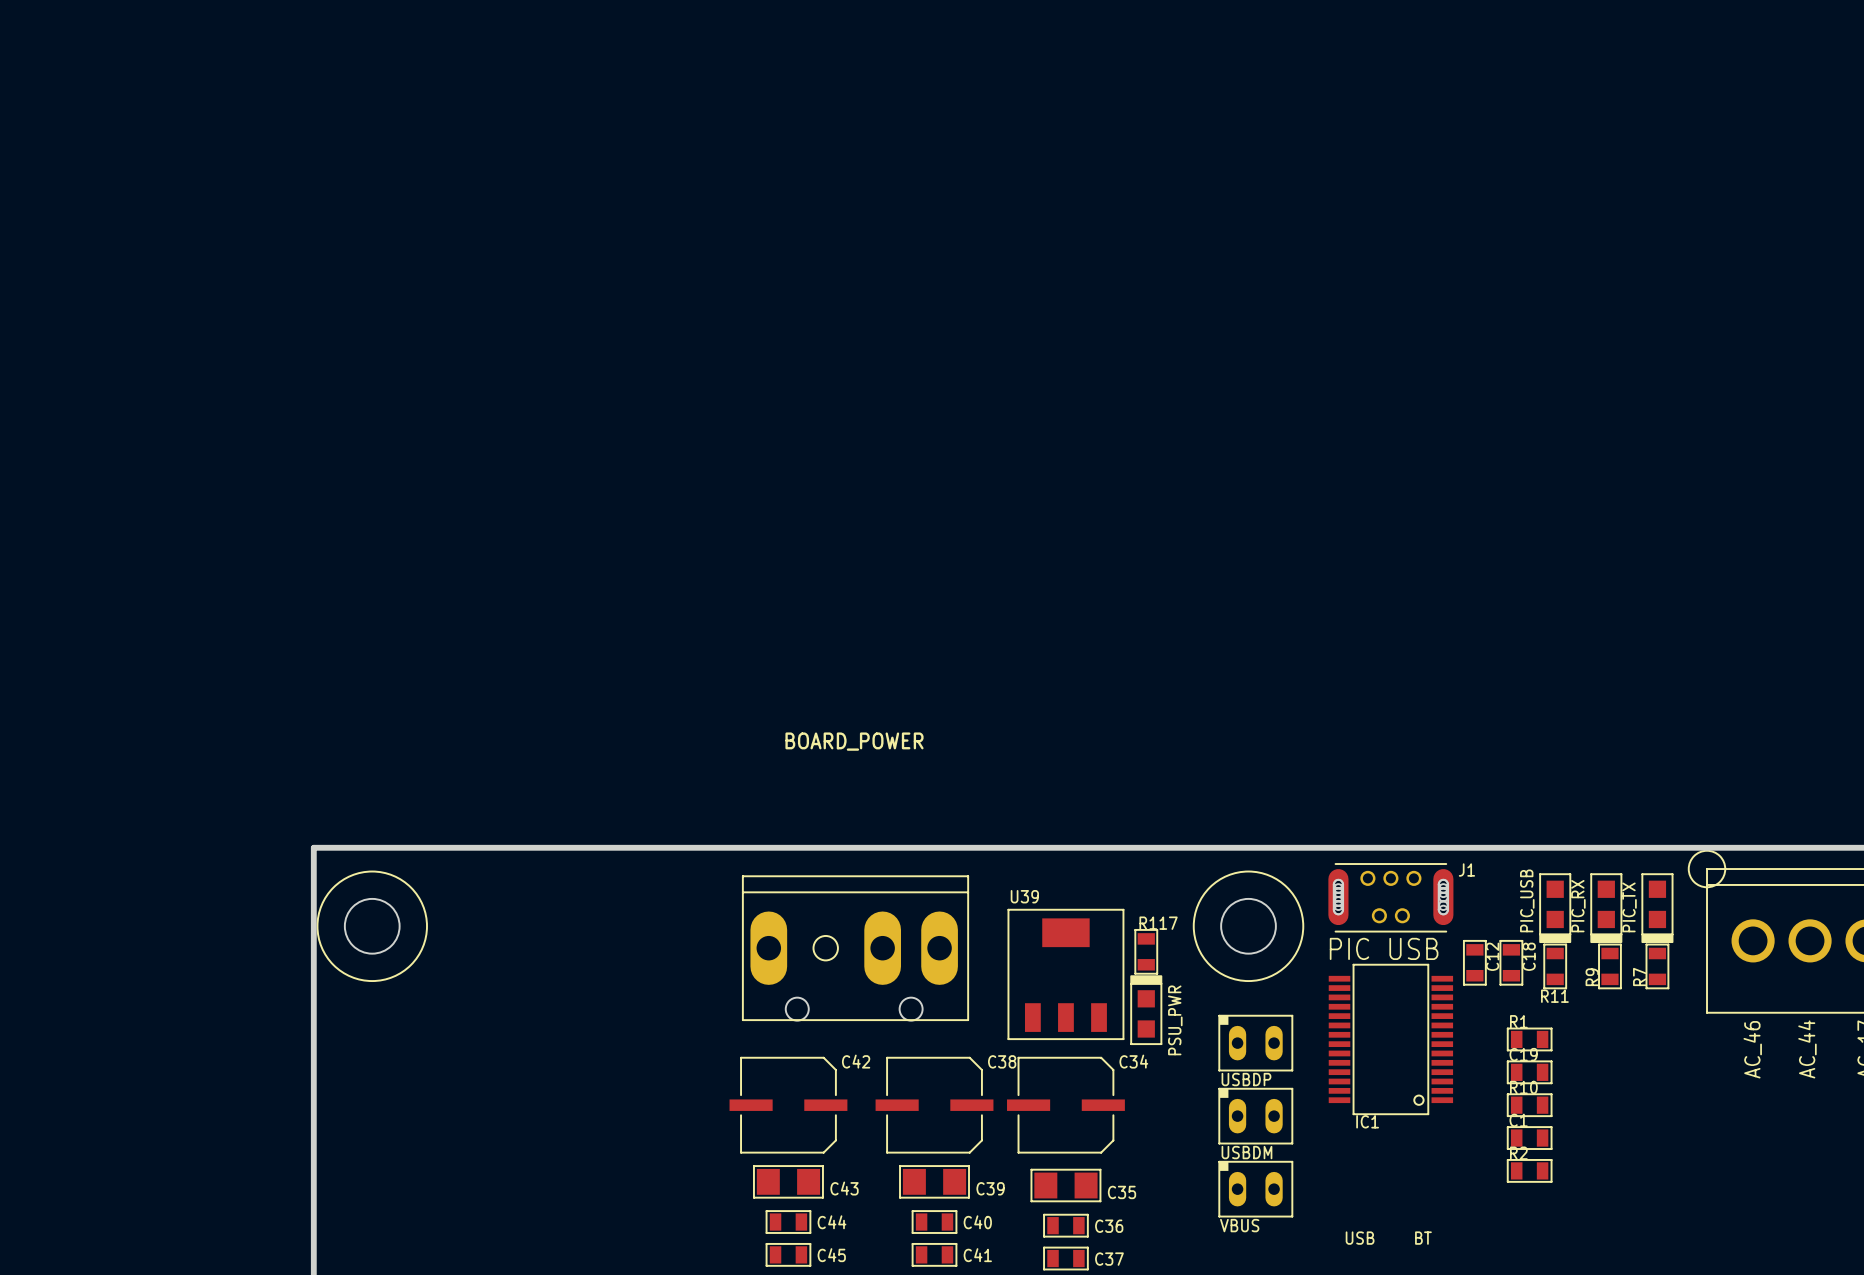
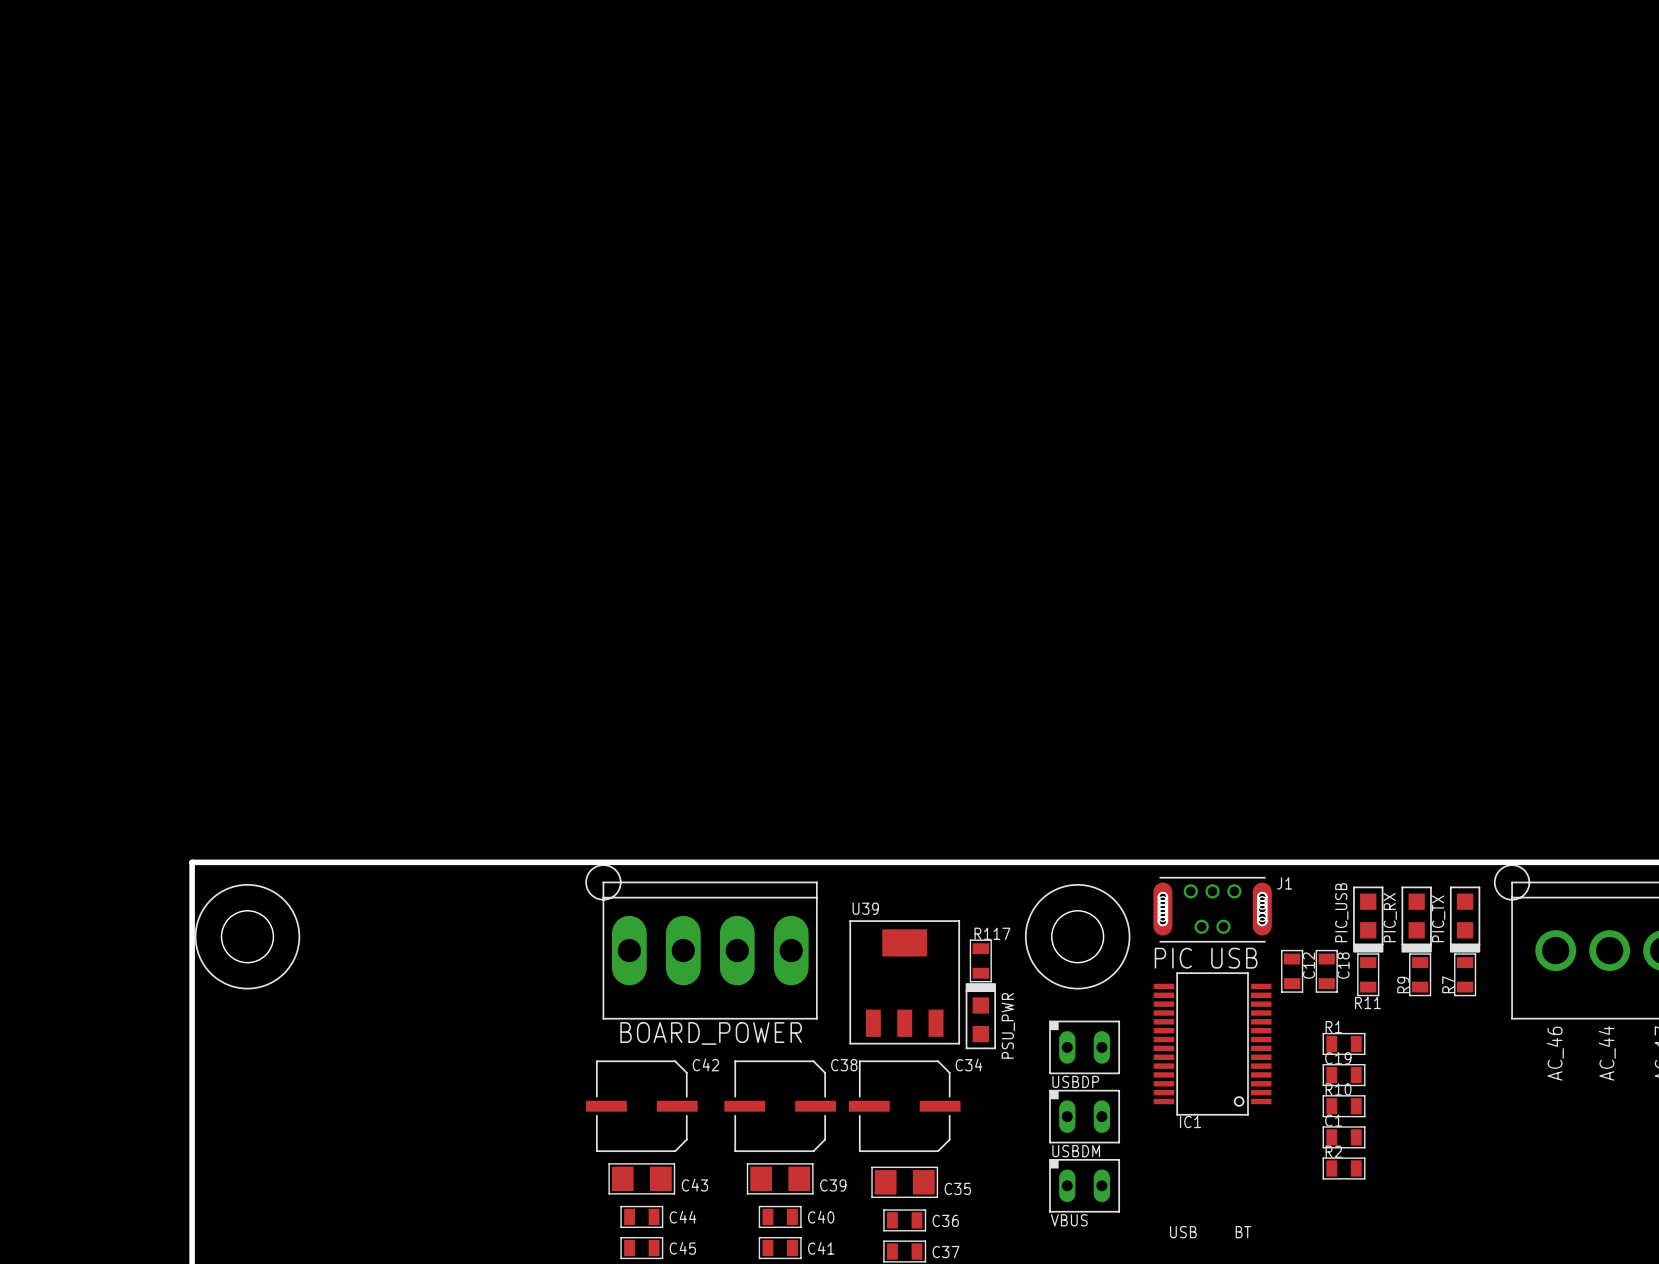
BOARD_POWER: none -> (701, 941)
BOARD_POWER: (855, 948) -> none

